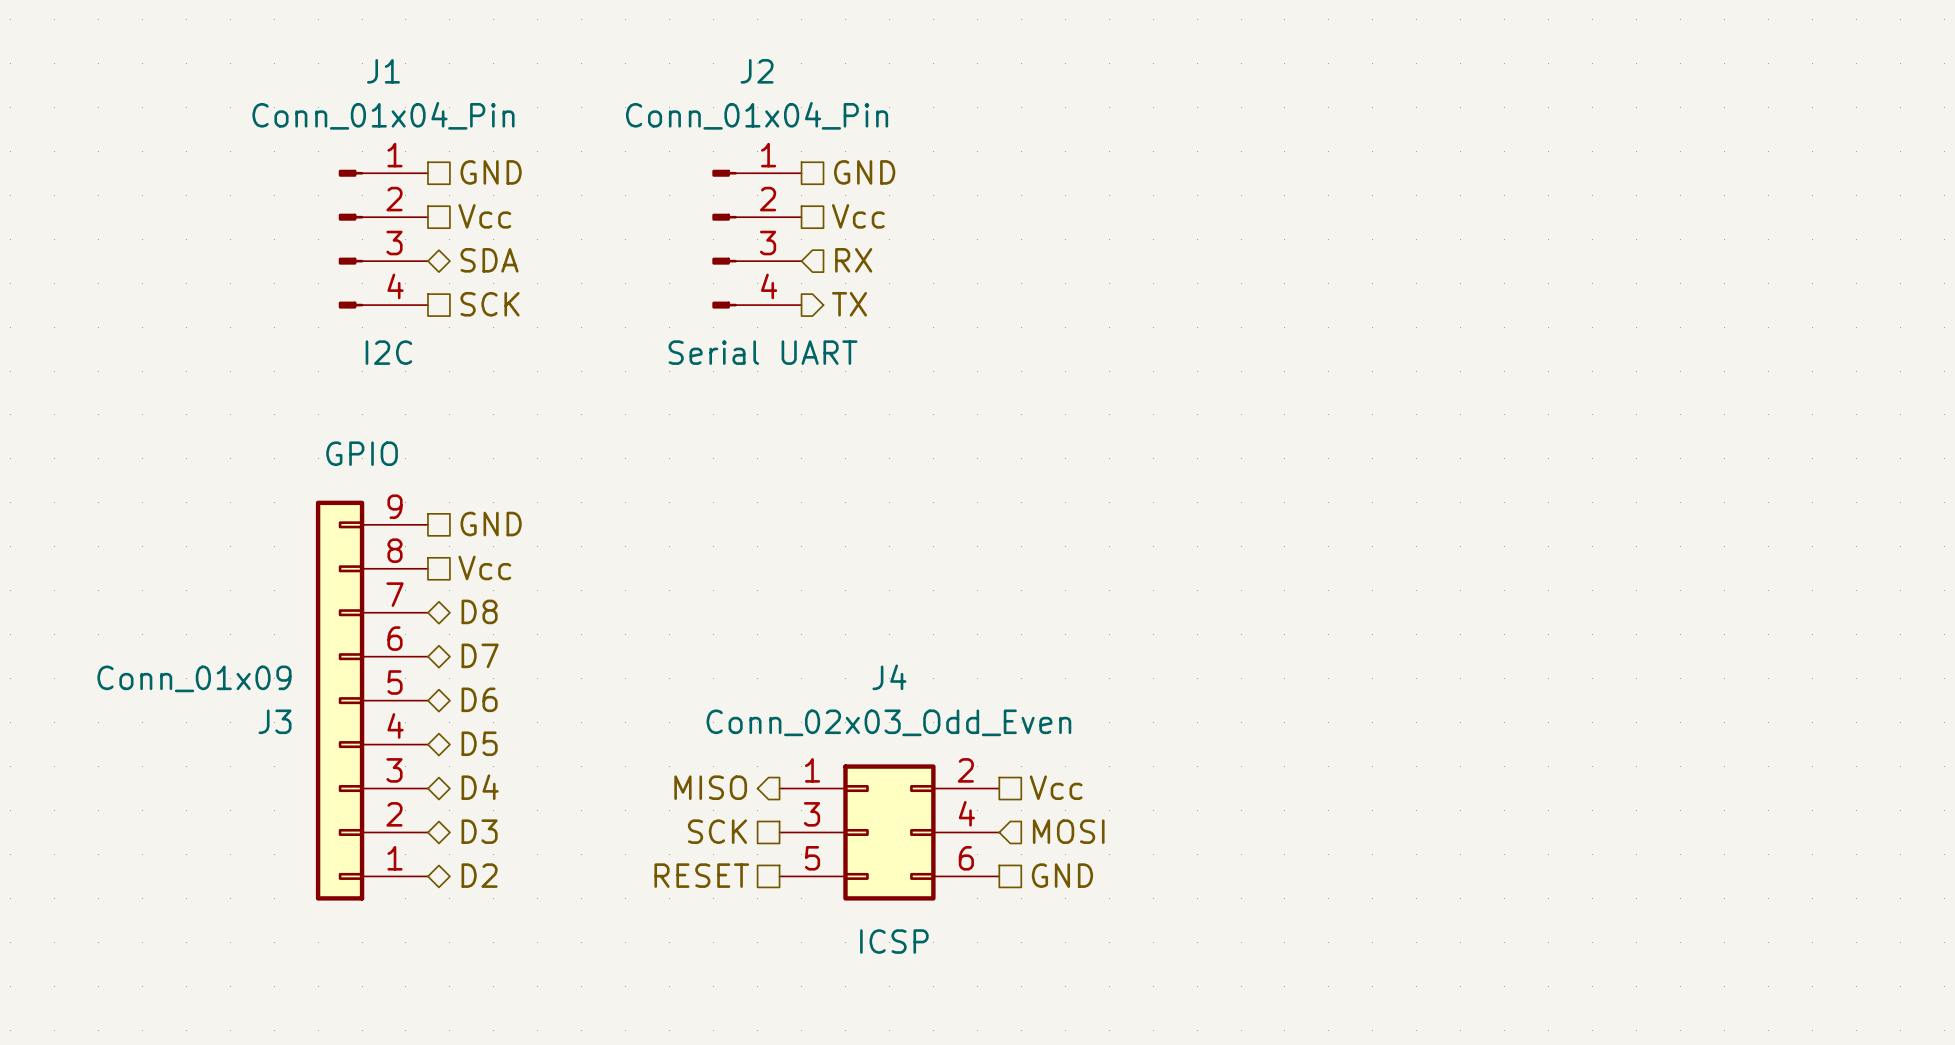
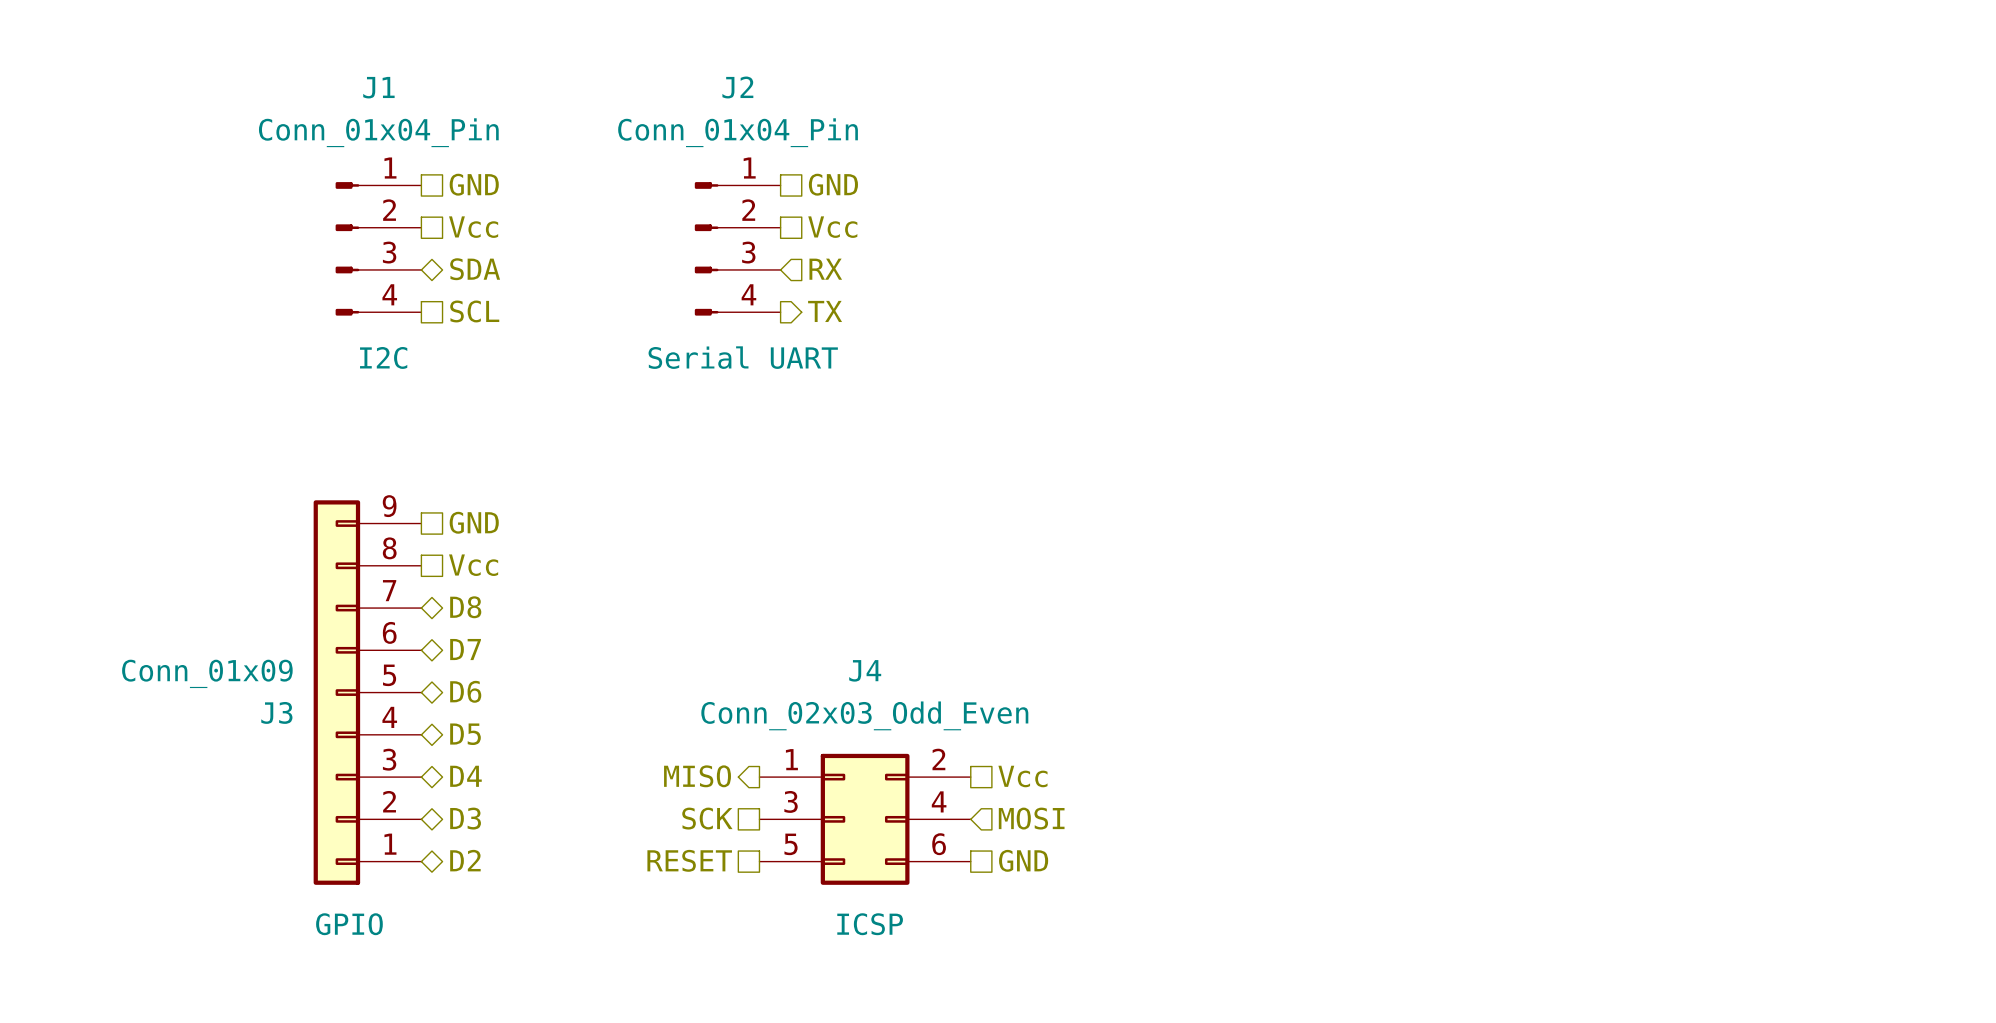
hierarchical label: SCK (490, 304) -> SCL (474, 311)
J3 text position: GPIO (362, 453) -> GPIO (349, 924)

